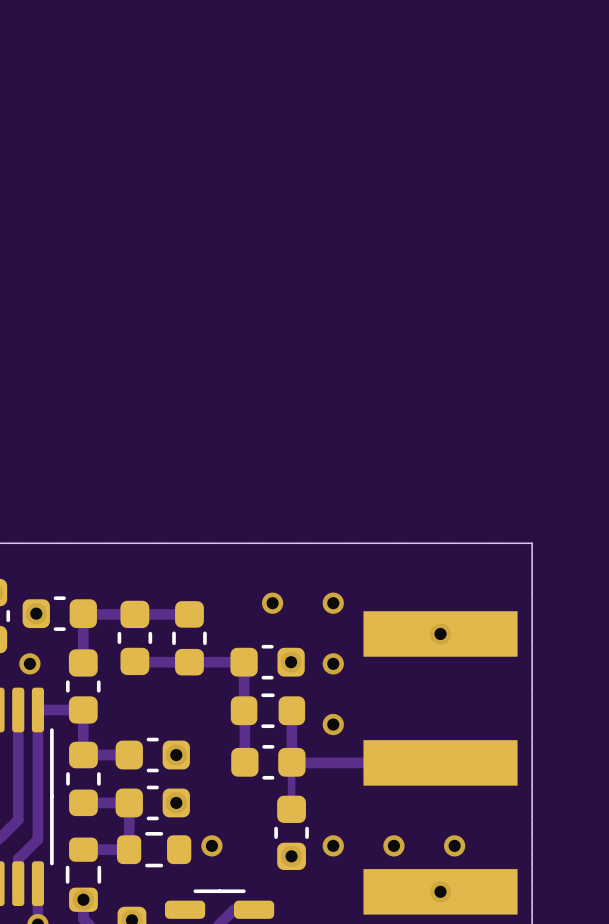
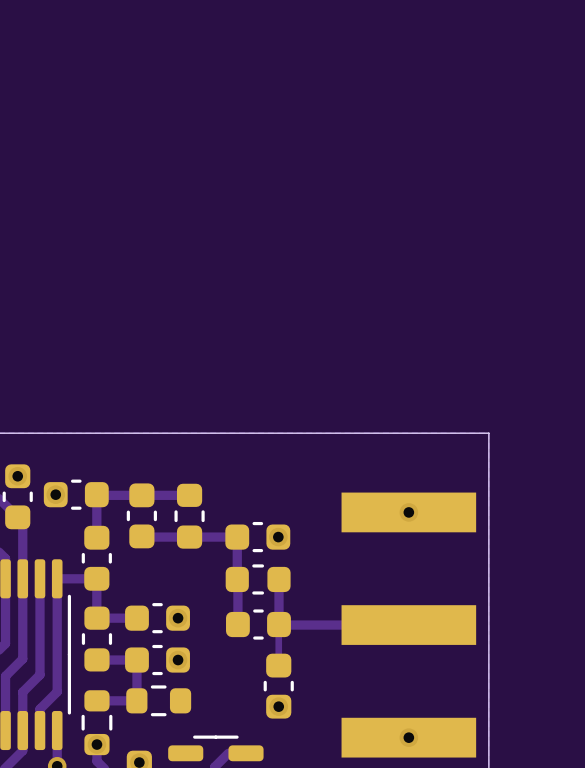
via: (272, 603) -> none
via: (333, 603) -> none
via: (29, 663) -> none
via: (333, 663) -> none
via: (333, 724) -> none
via: (211, 845) -> none
via: (333, 845) -> none
via: (393, 845) -> none
via: (454, 845) -> none

